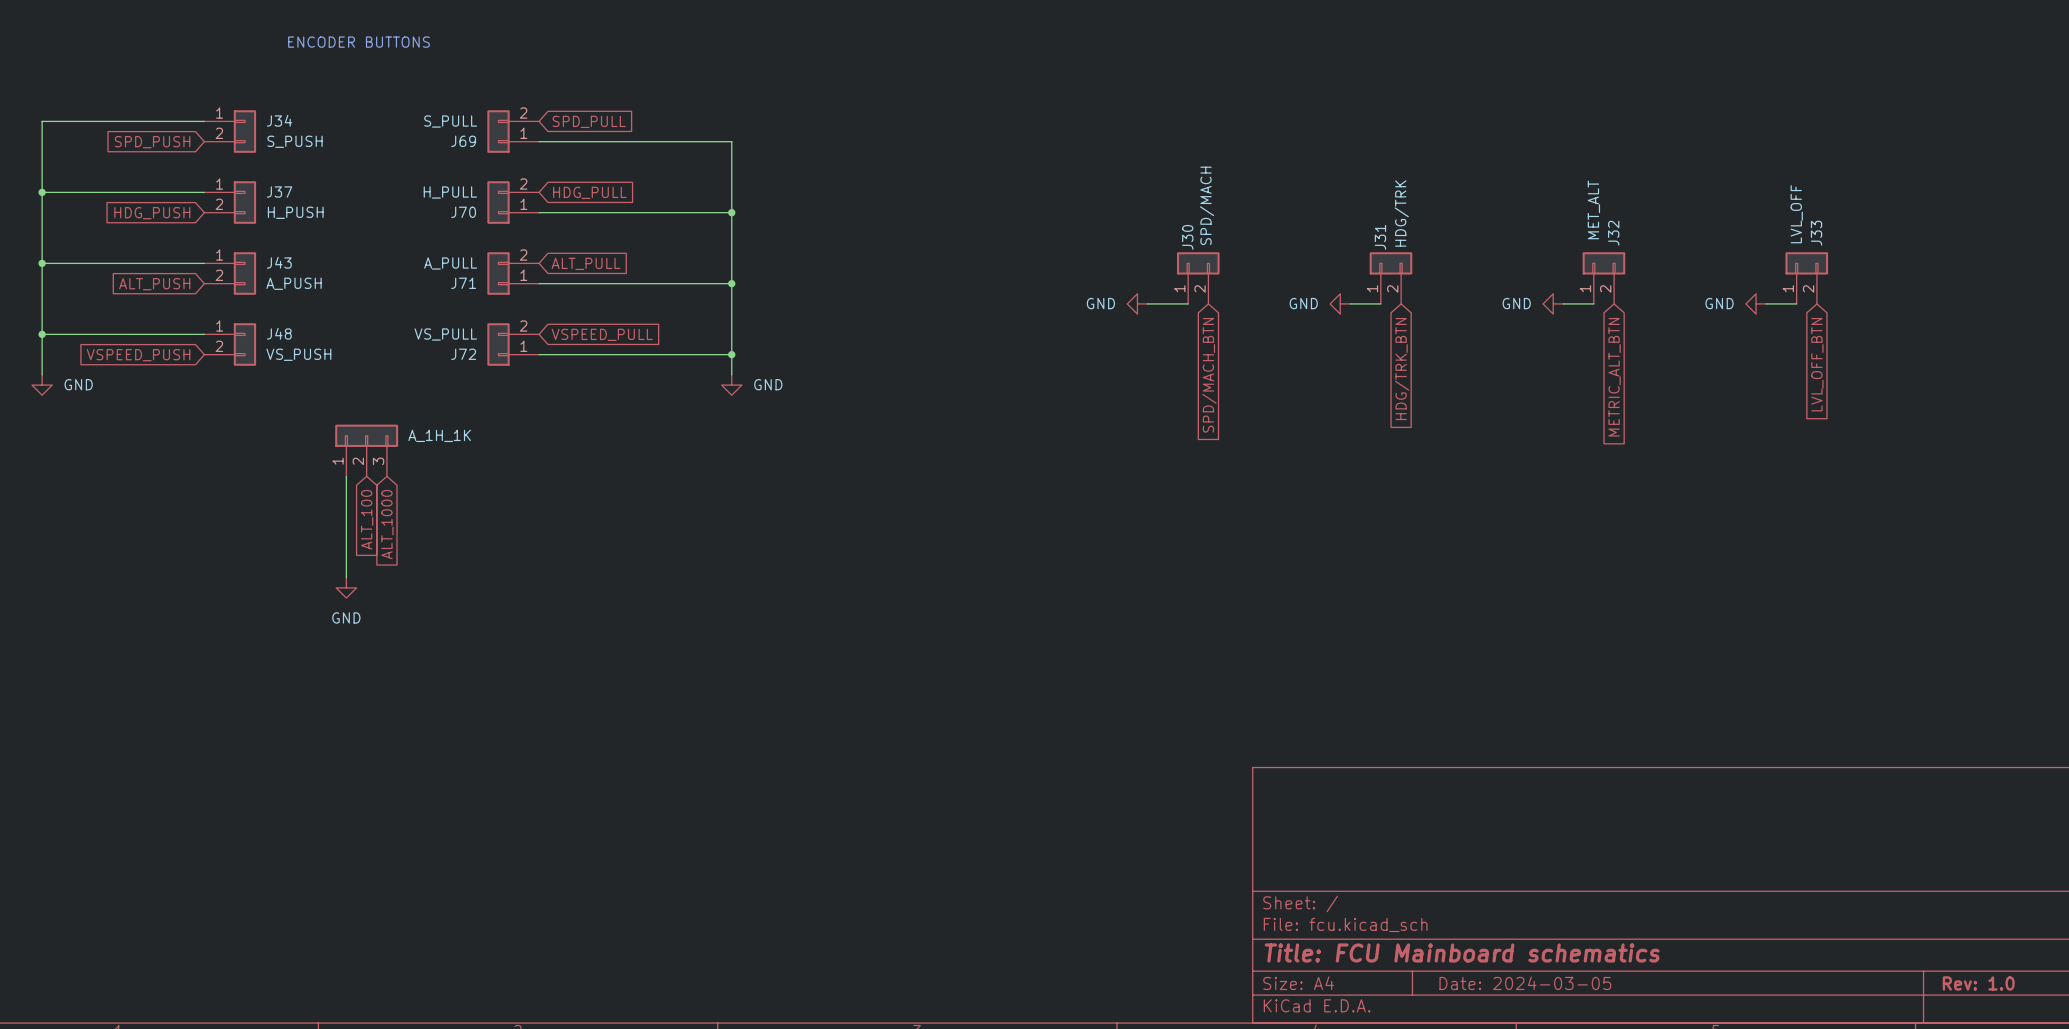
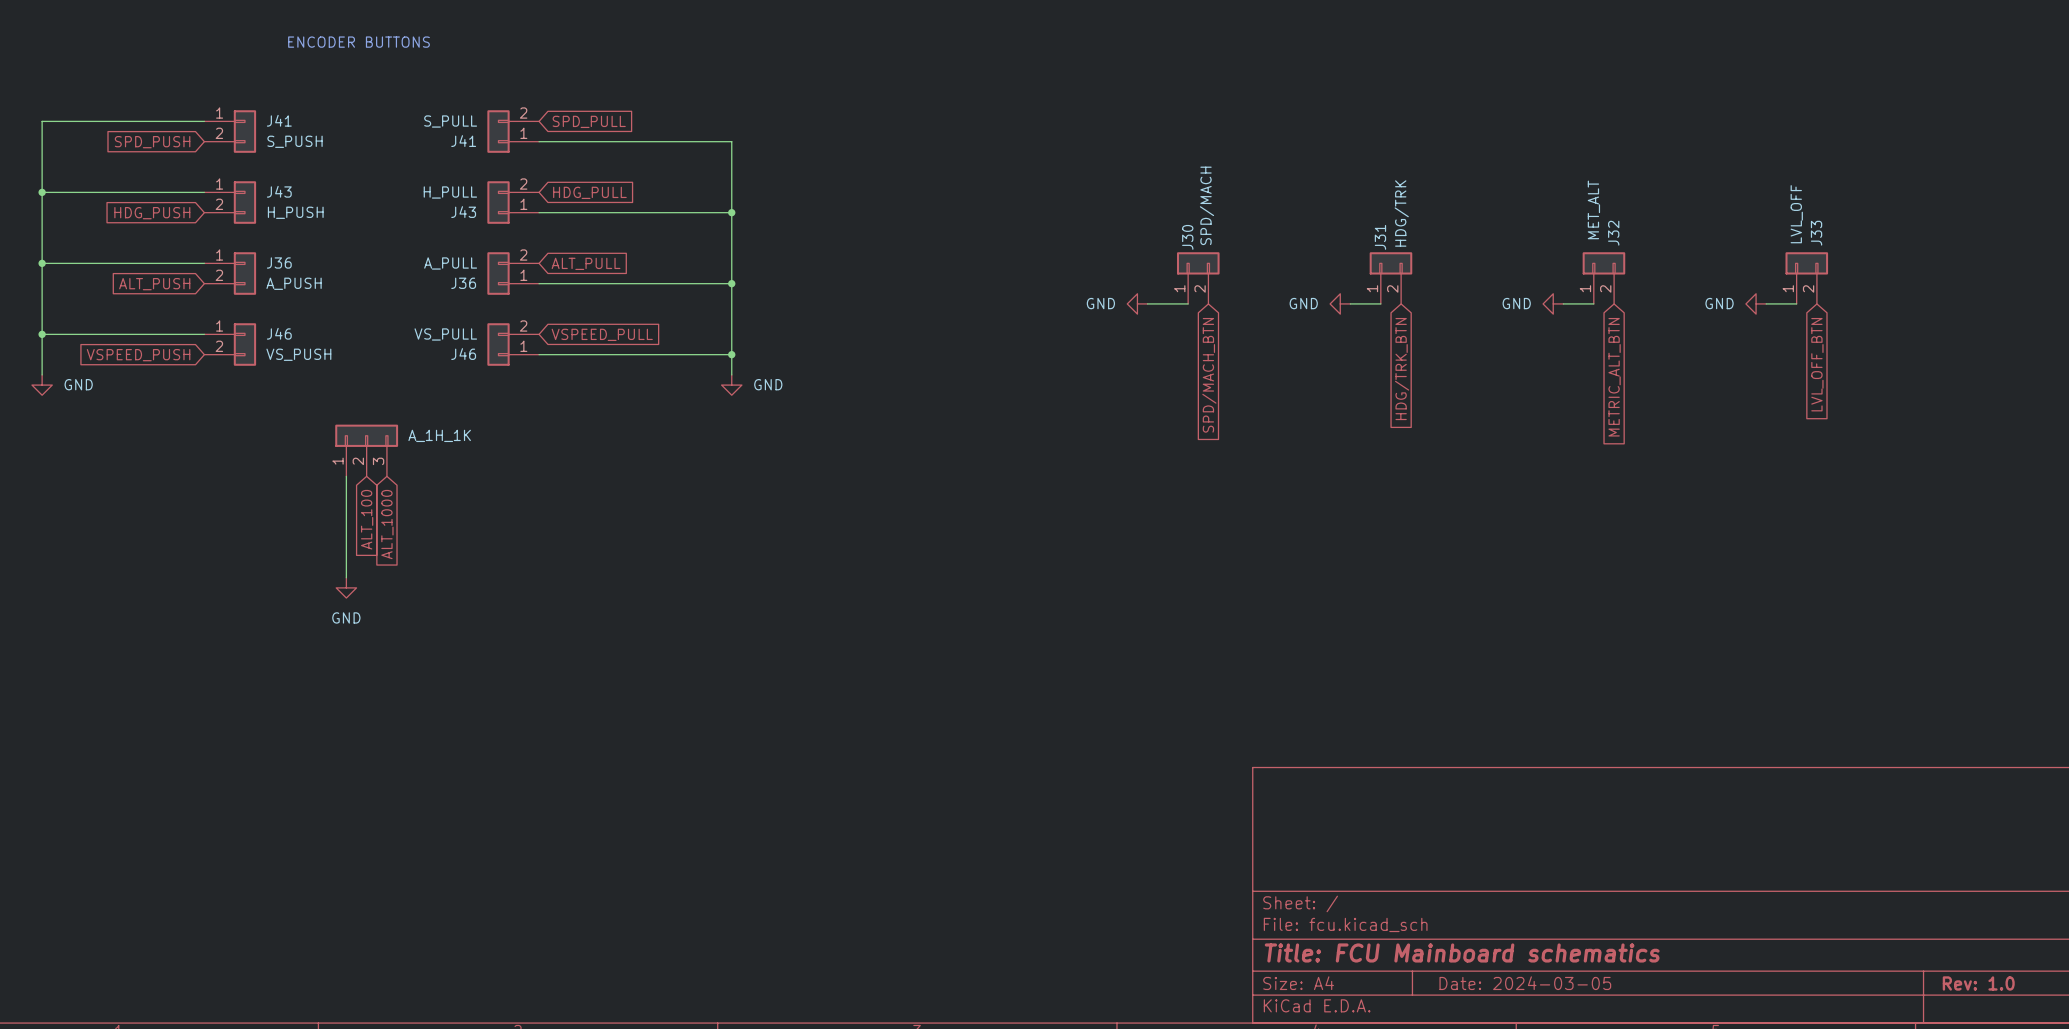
J34 name: J34 (279, 120) -> J41 (279, 120)
J69 name: J69 (463, 141) -> J41 (463, 141)
J37 name: J37 (279, 192) -> J43 (279, 191)
J70 name: J70 (463, 212) -> J43 (463, 212)
J43 name: J43 (279, 262) -> J36 (279, 263)
J71 name: J71 (463, 283) -> J36 (463, 283)
J48 name: J48 (279, 333) -> J46 (279, 333)
J72 name: J72 (463, 354) -> J46 (463, 354)

